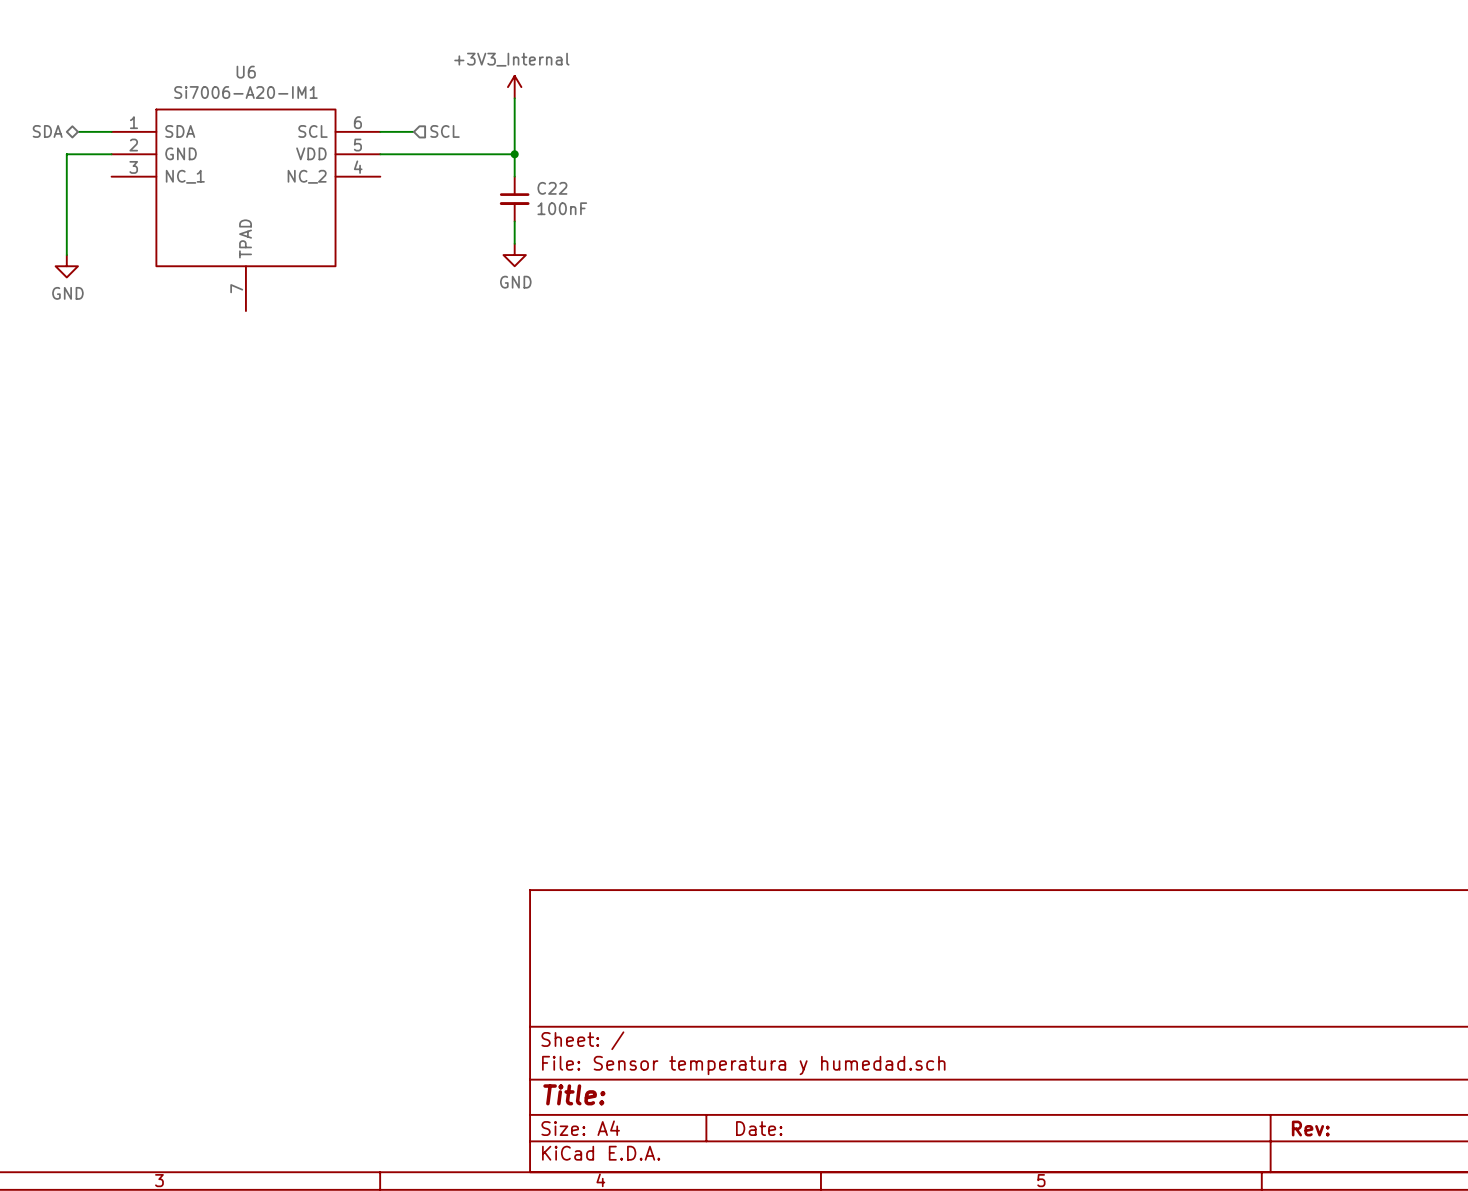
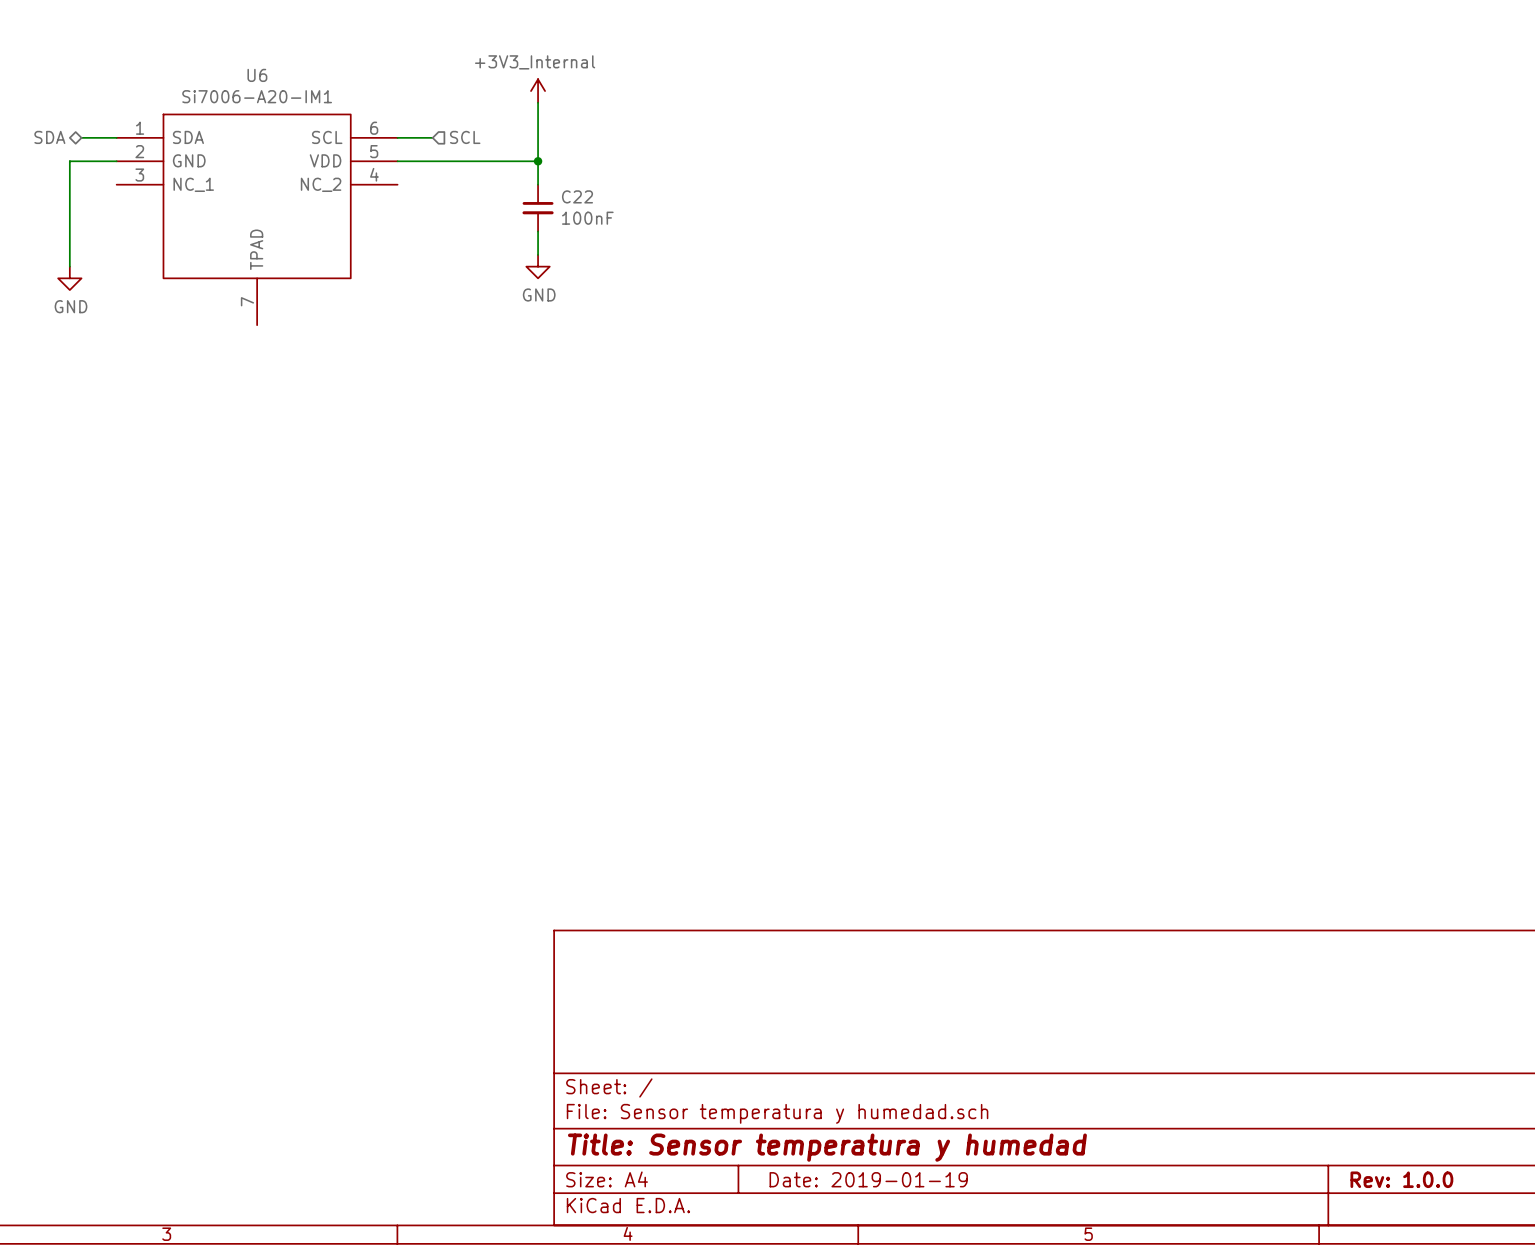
title block: Title: (574, 1094) -> Title: Sensor temperatura y humedad (827, 1147)
title block: Date: (759, 1128) -> Date: 2019-01-19 (868, 1179)
title block: Rev: (1310, 1128) -> Rev: 1.0.0 (1401, 1179)

